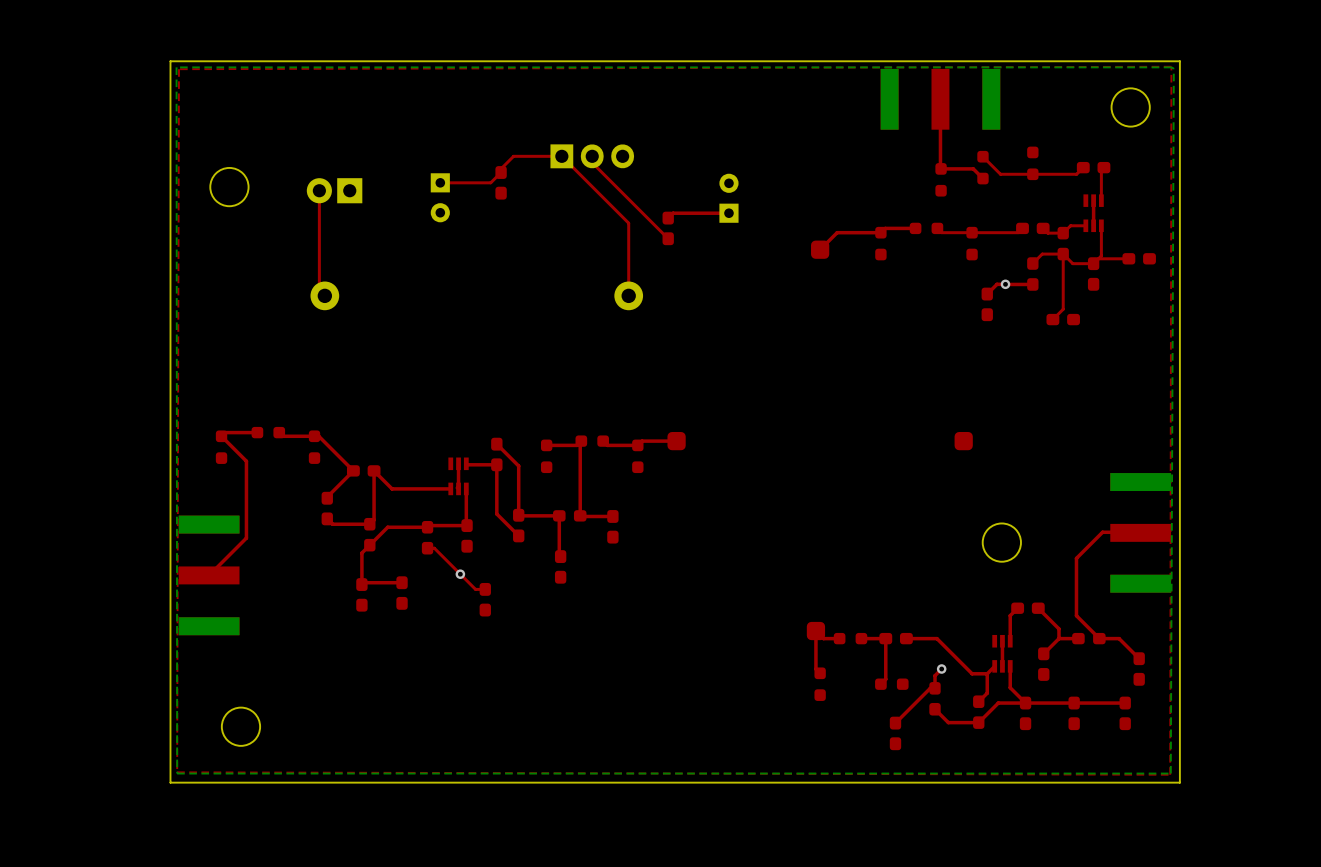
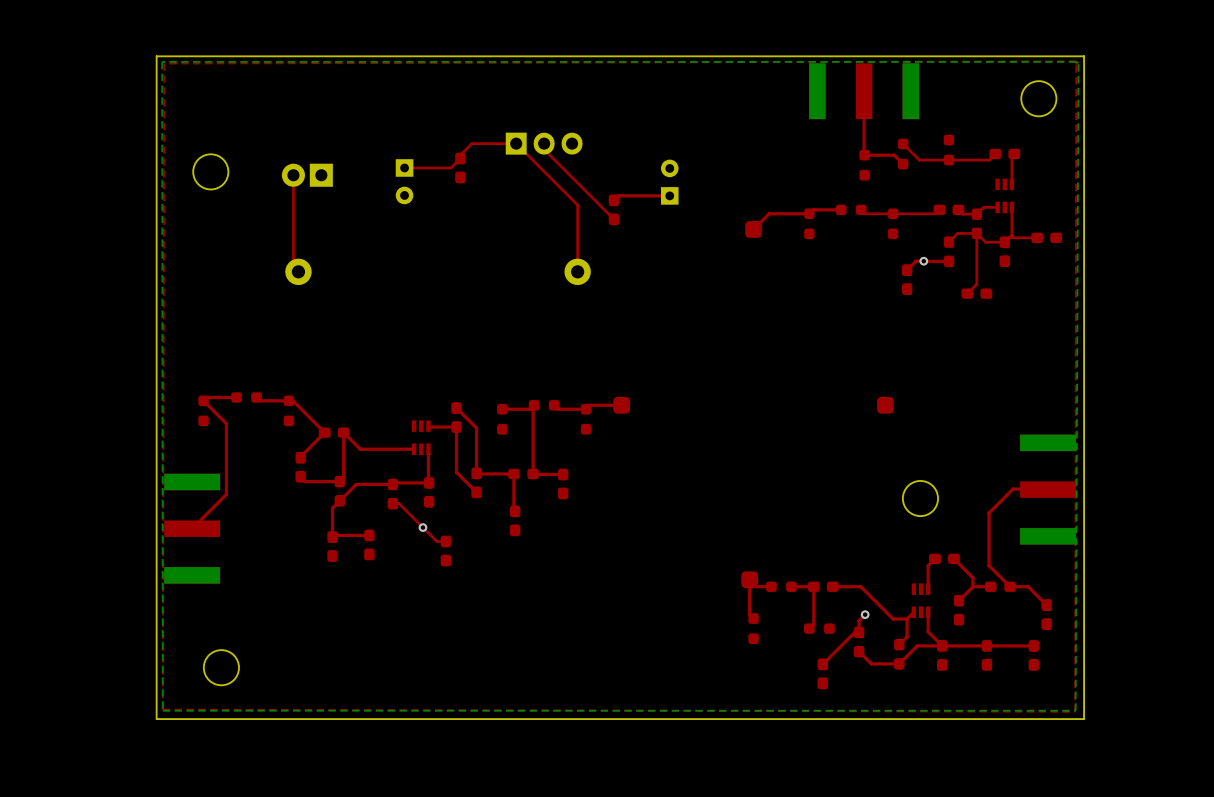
top track: (1093, 200) (1093, 225) -> none
top track: (458, 463) (457, 487) -> none
top track: (1002, 641) (1002, 666) -> none

